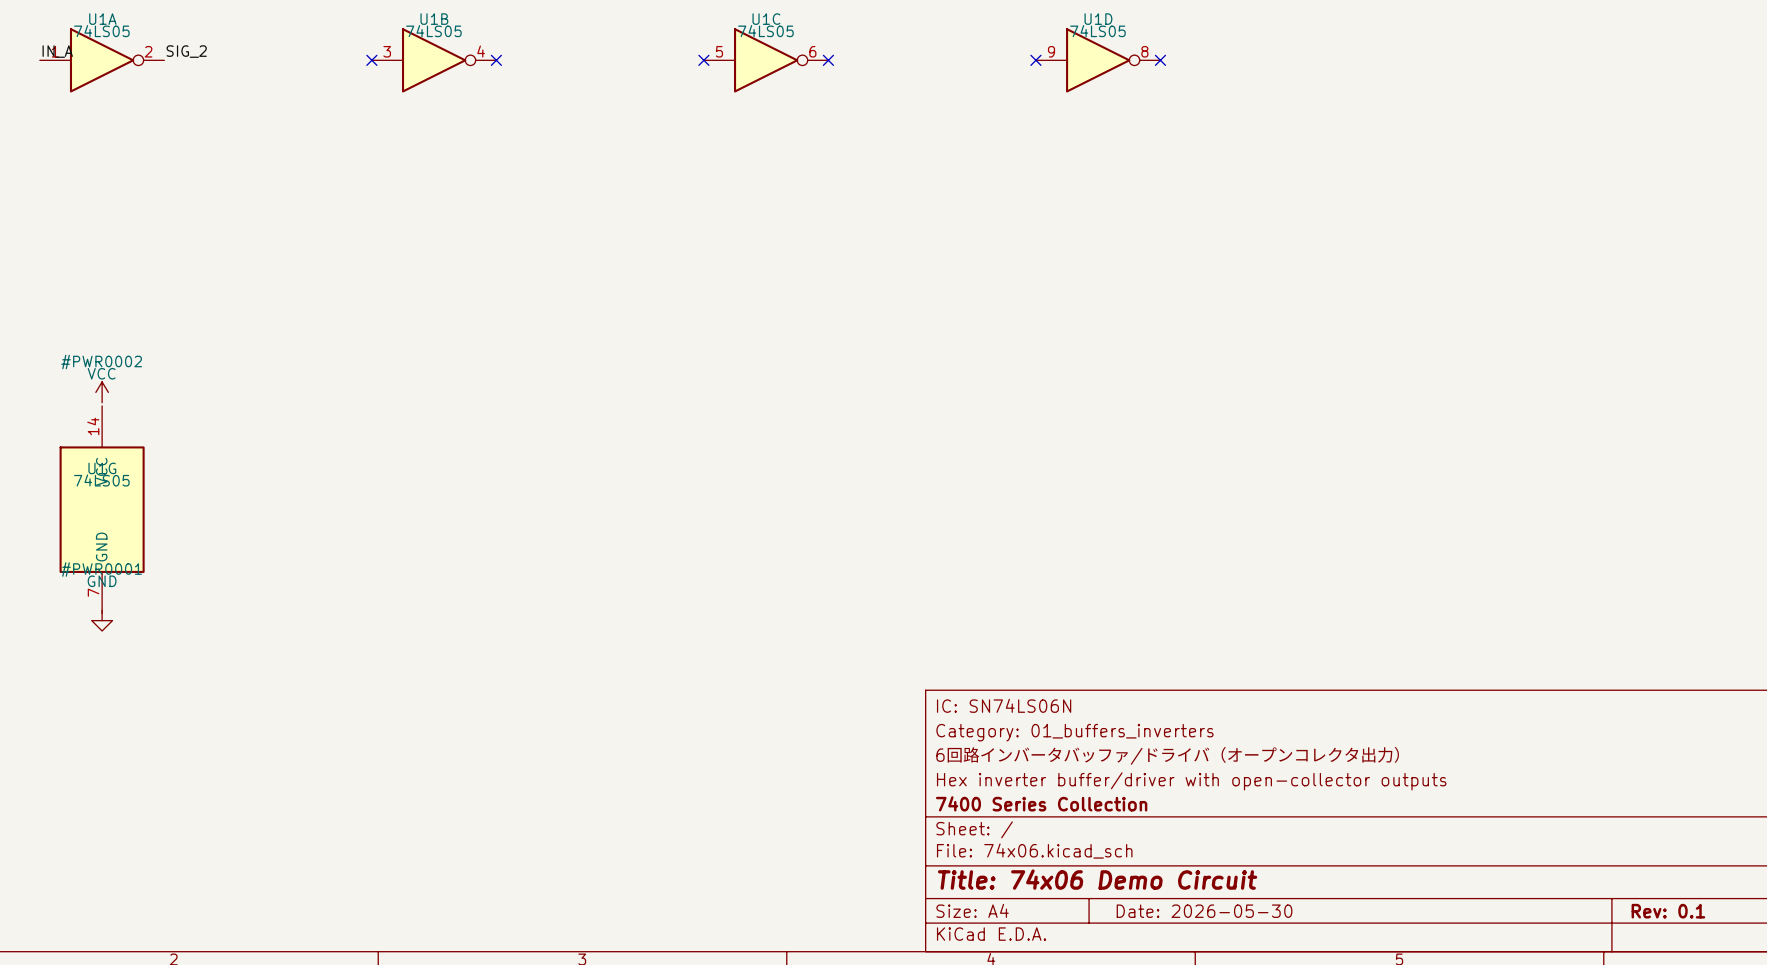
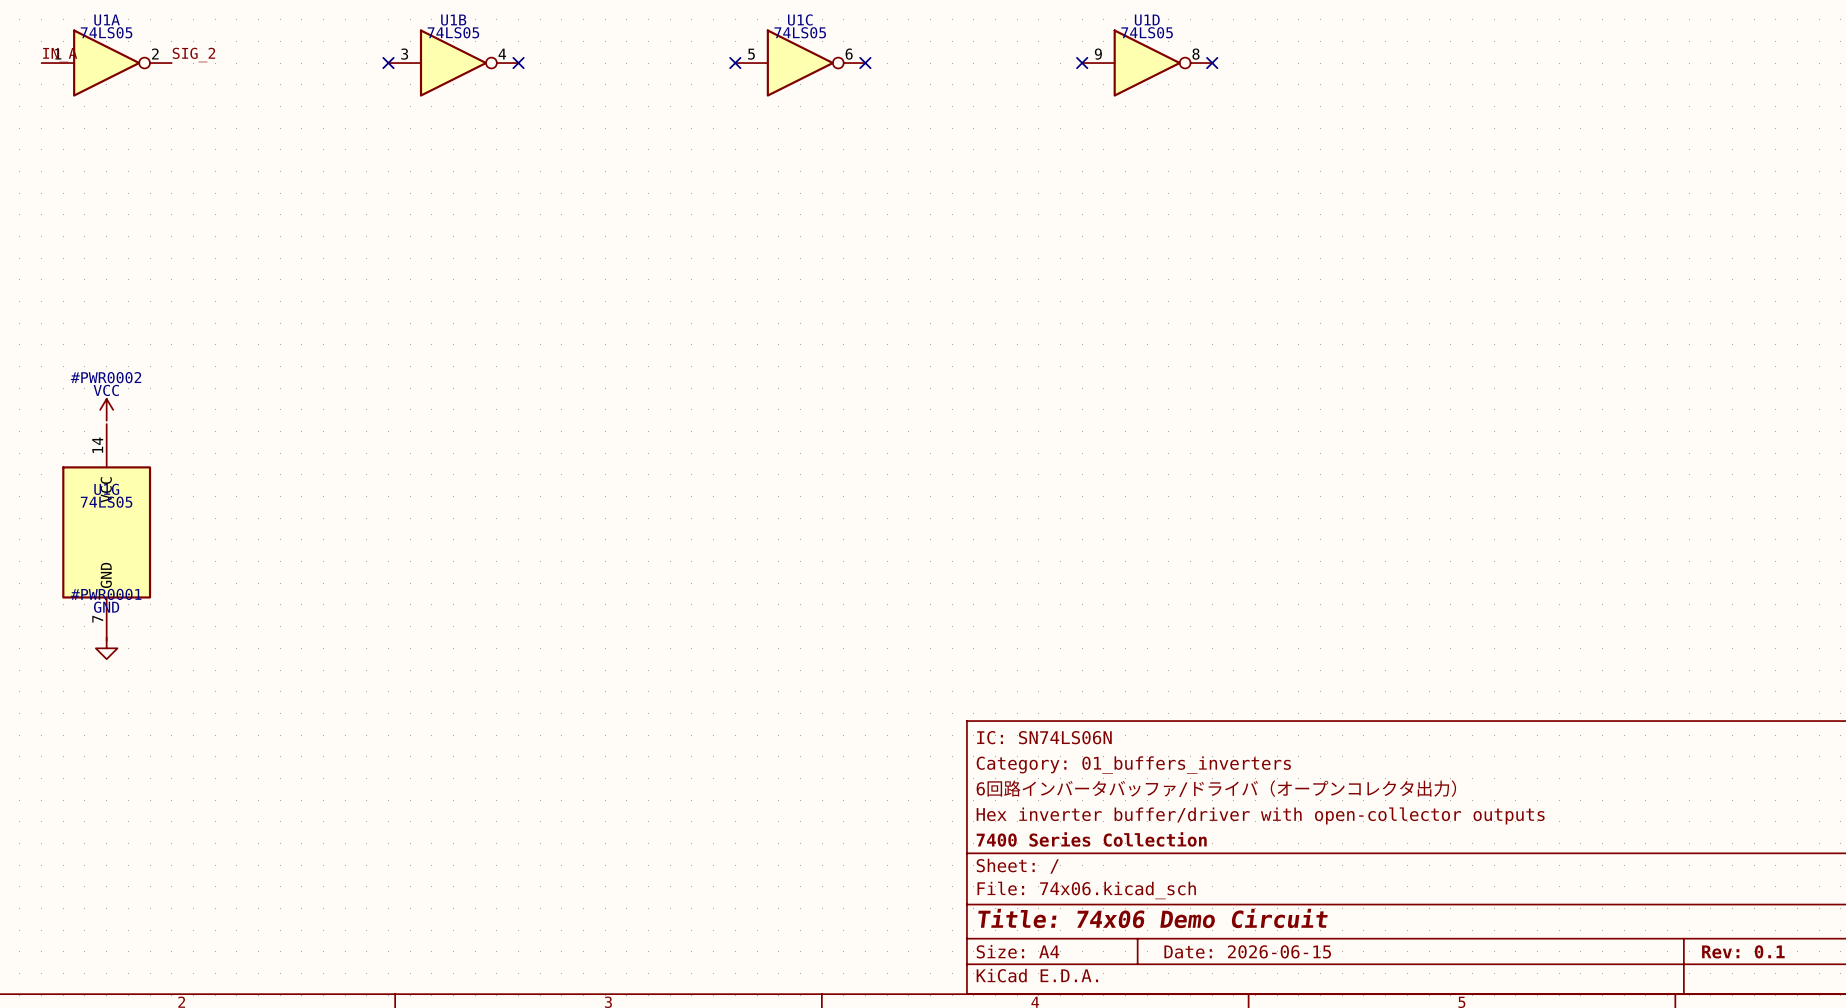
title block: Date: 2026-05-30 (1204, 911) -> Date: 2026-06-15 (1247, 951)

